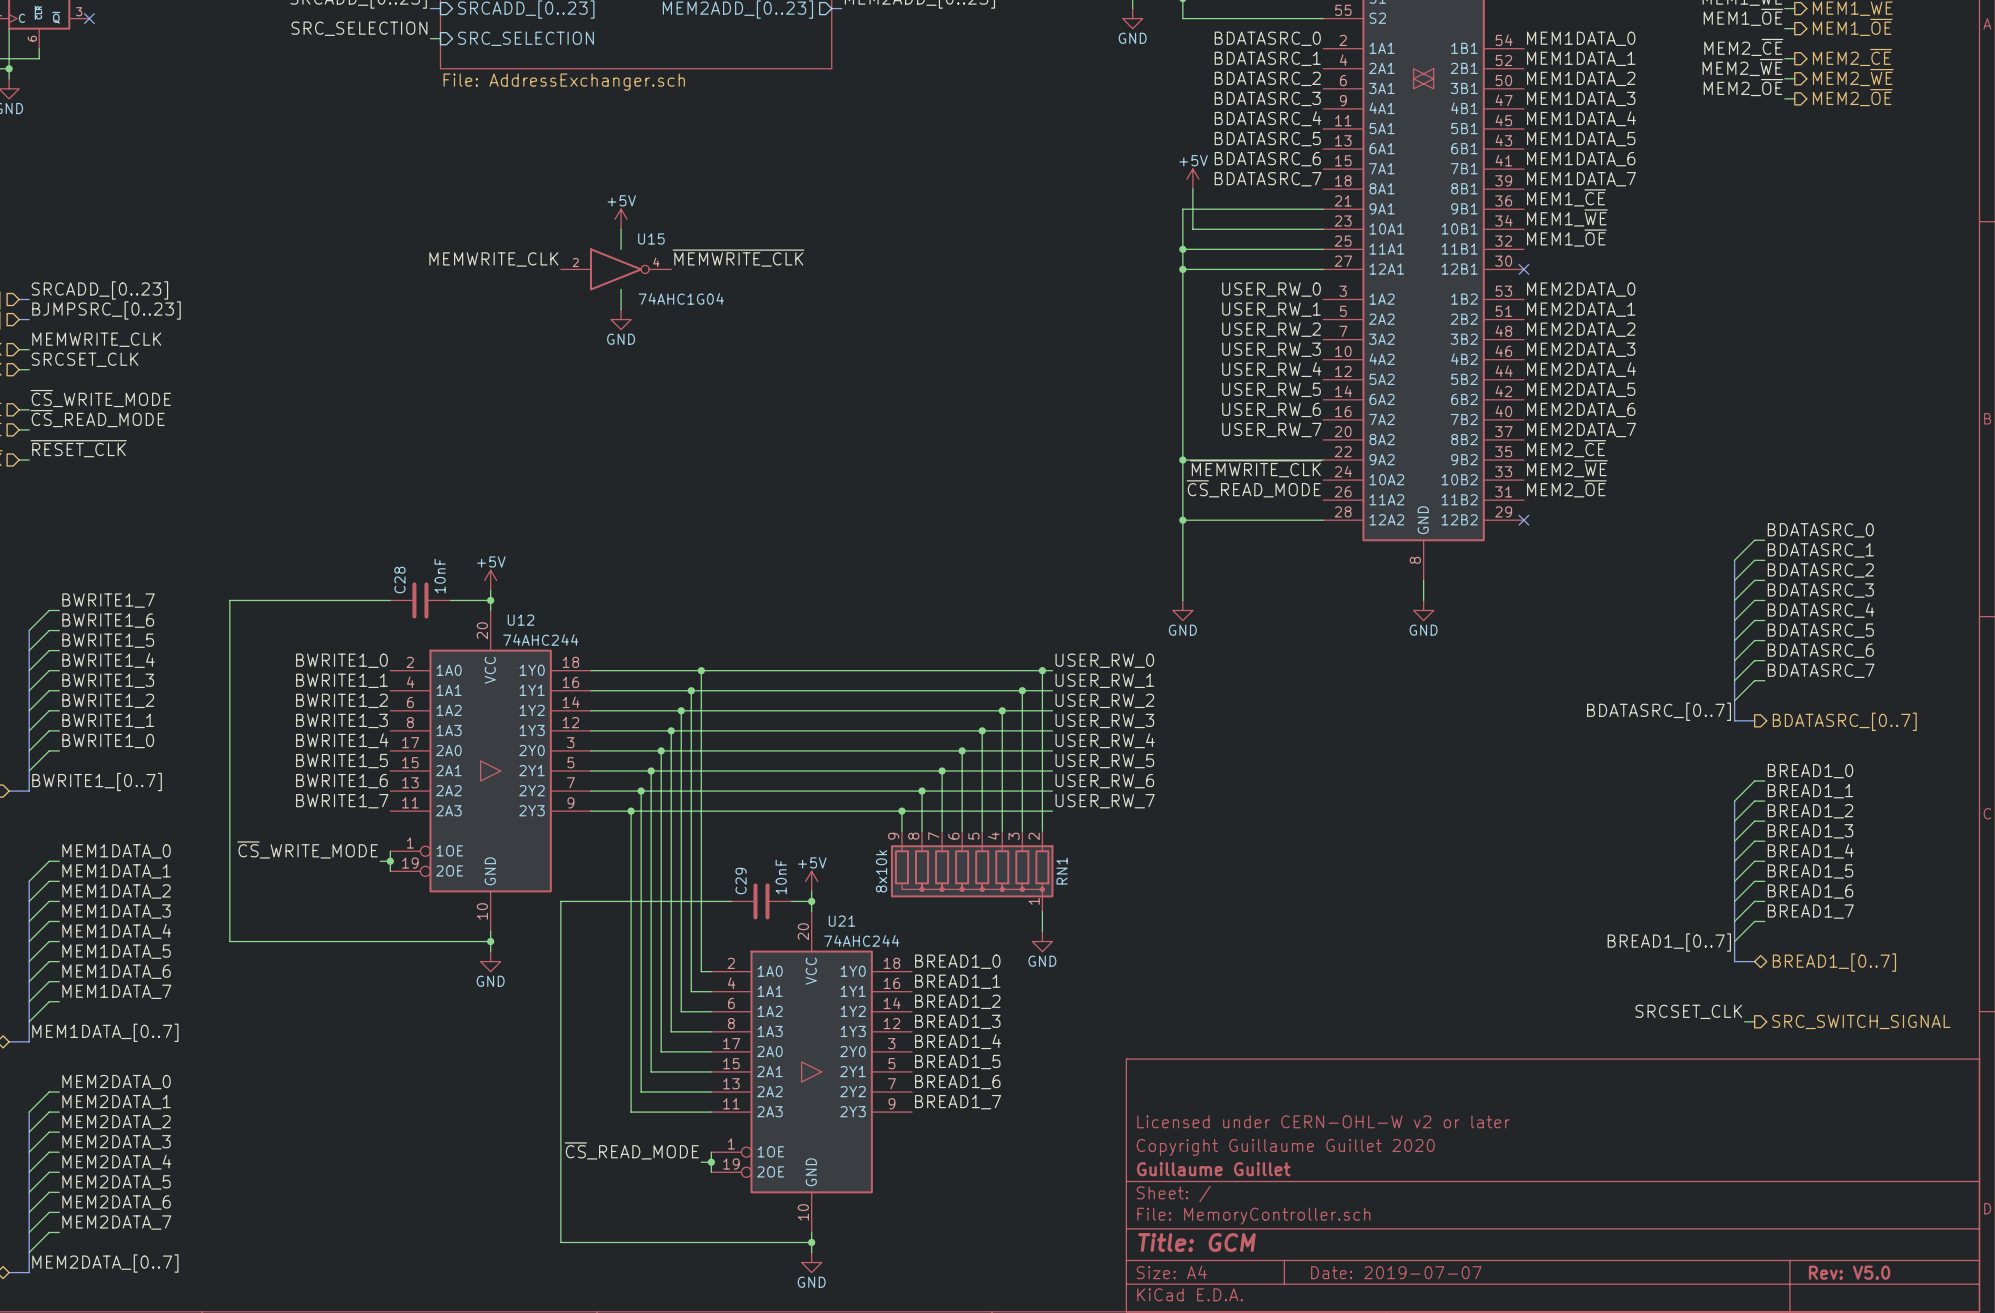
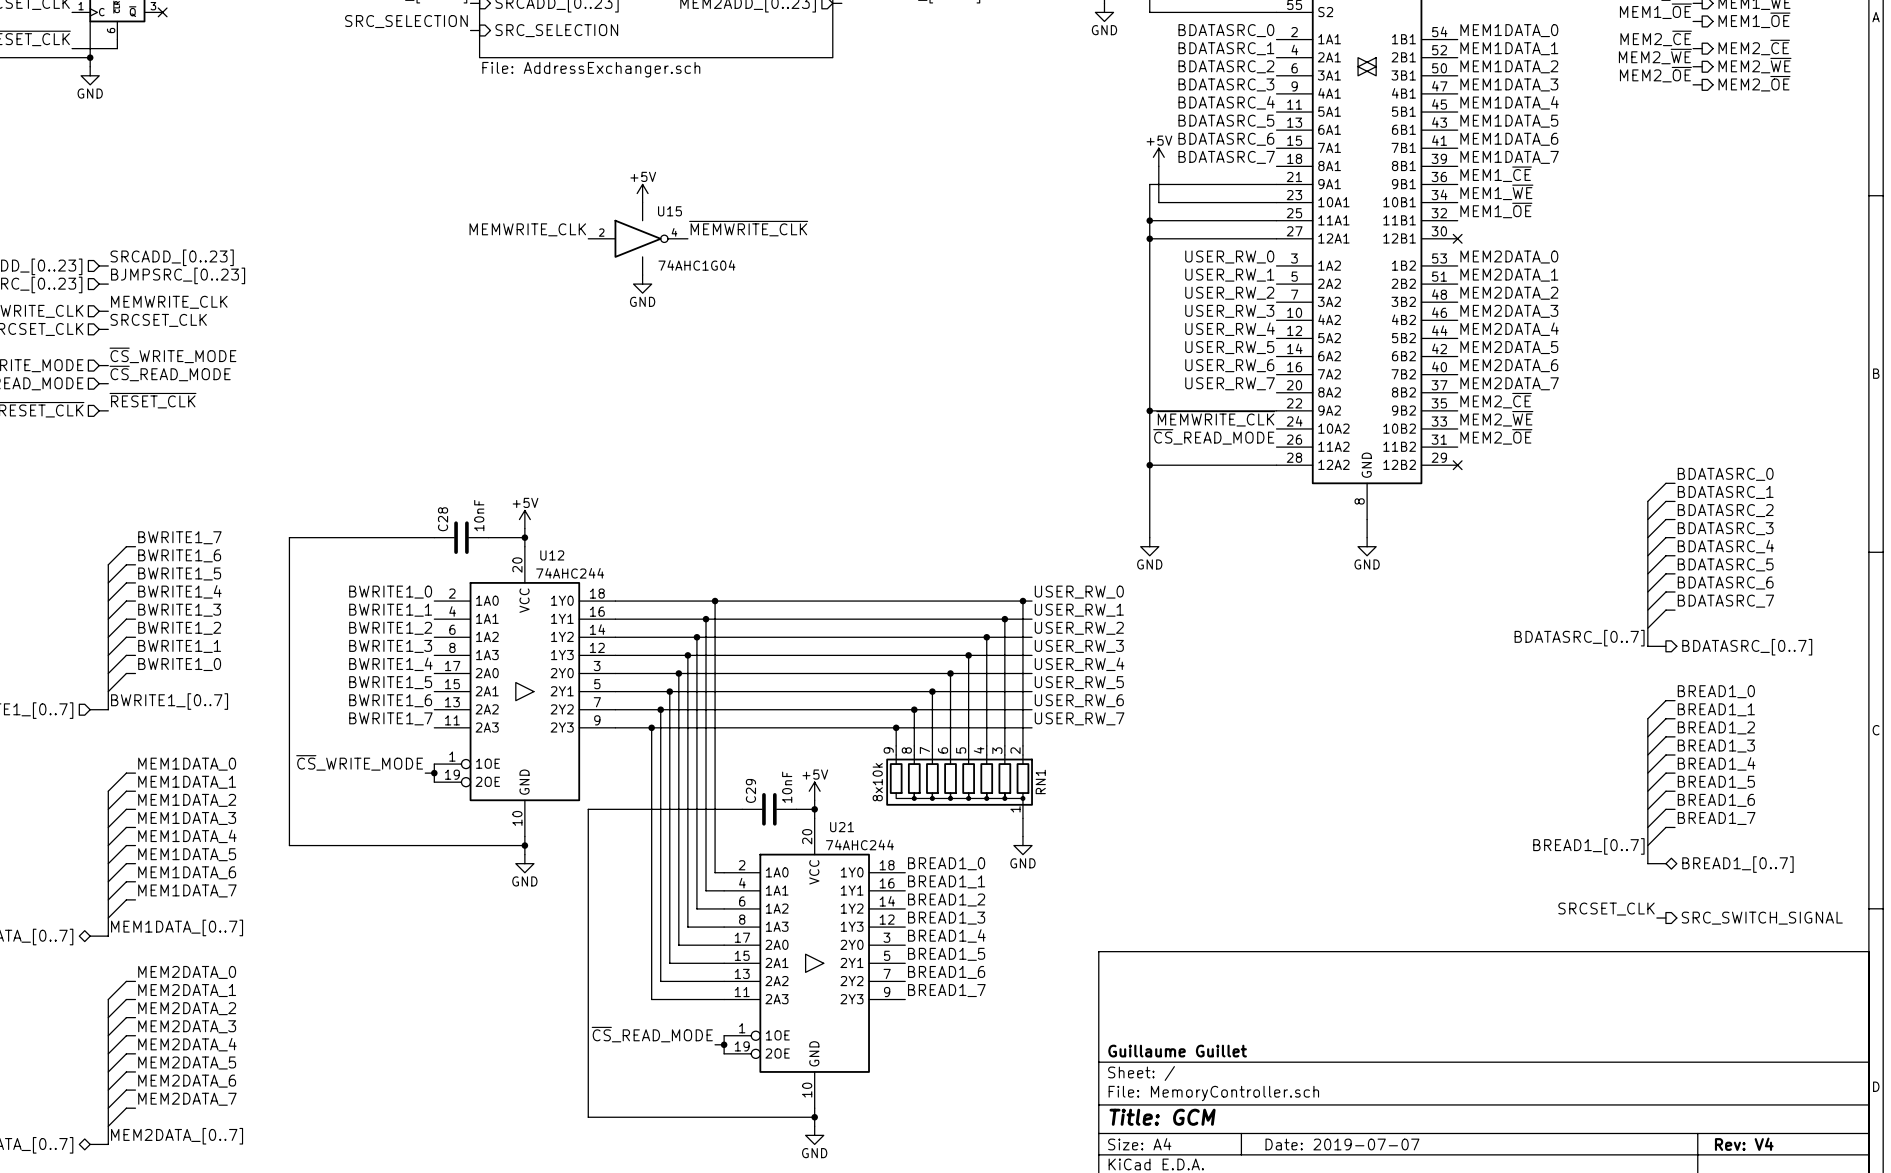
title block: Licensed under CERN-OHL-W v2 or later (1323, 1121) -> none
title block: Copyright Guillaume Guillet 2020 (1285, 1147) -> none
title block: Rev: V5.0 (1849, 1272) -> Rev: V4 (1744, 1144)

